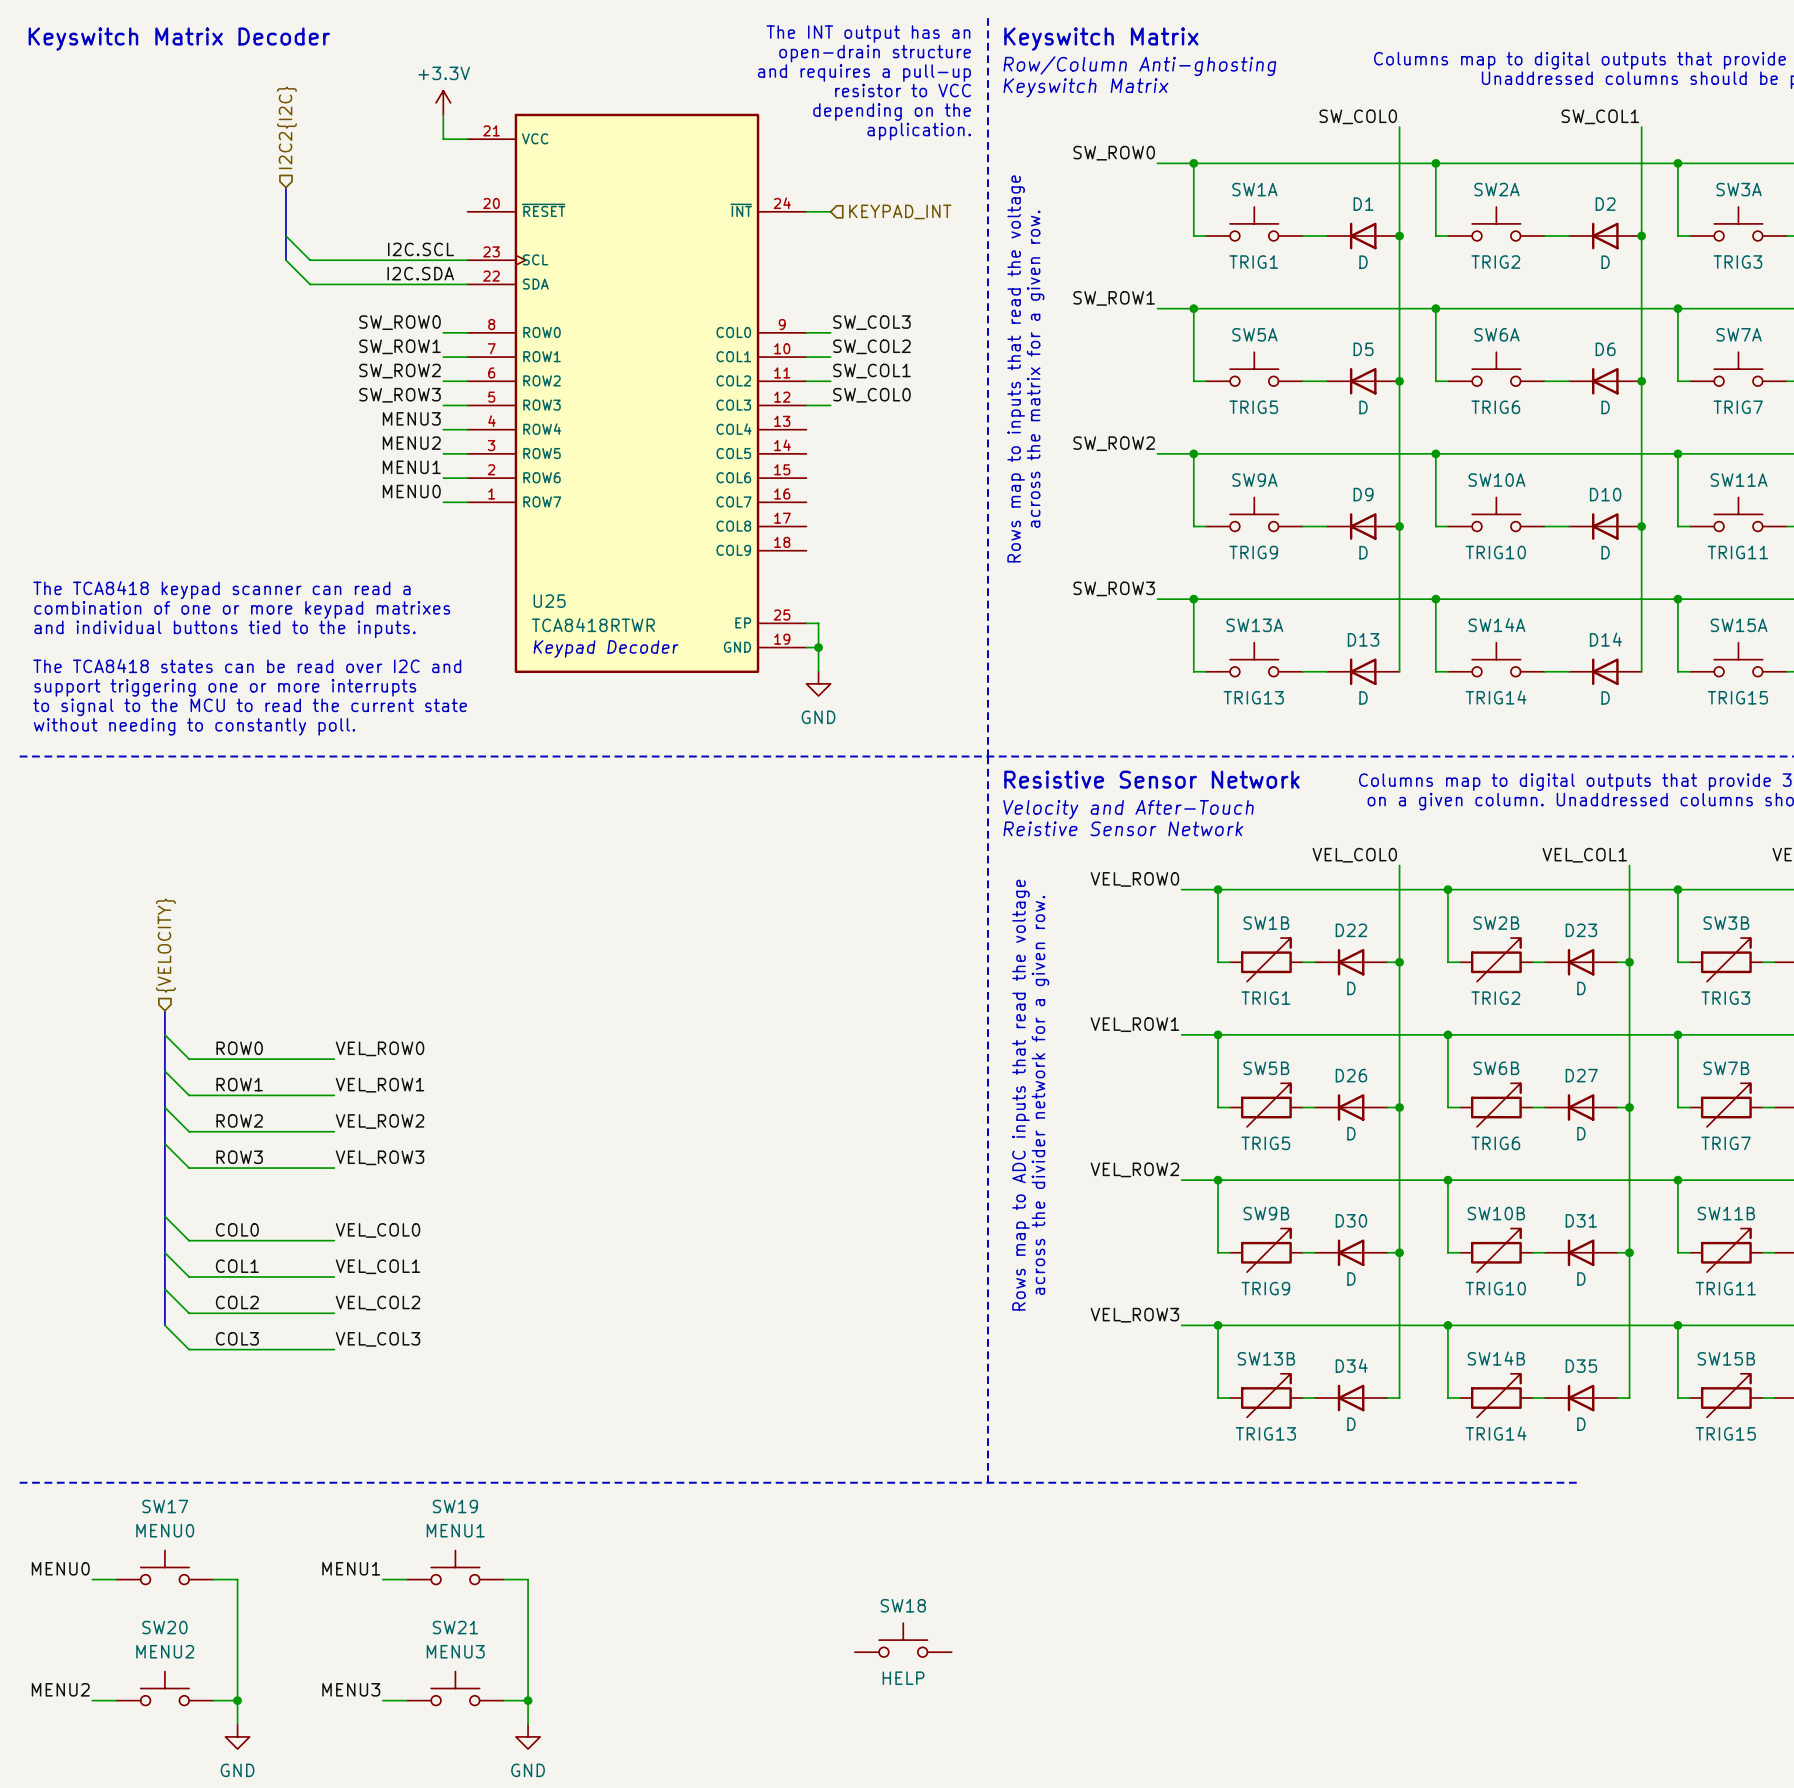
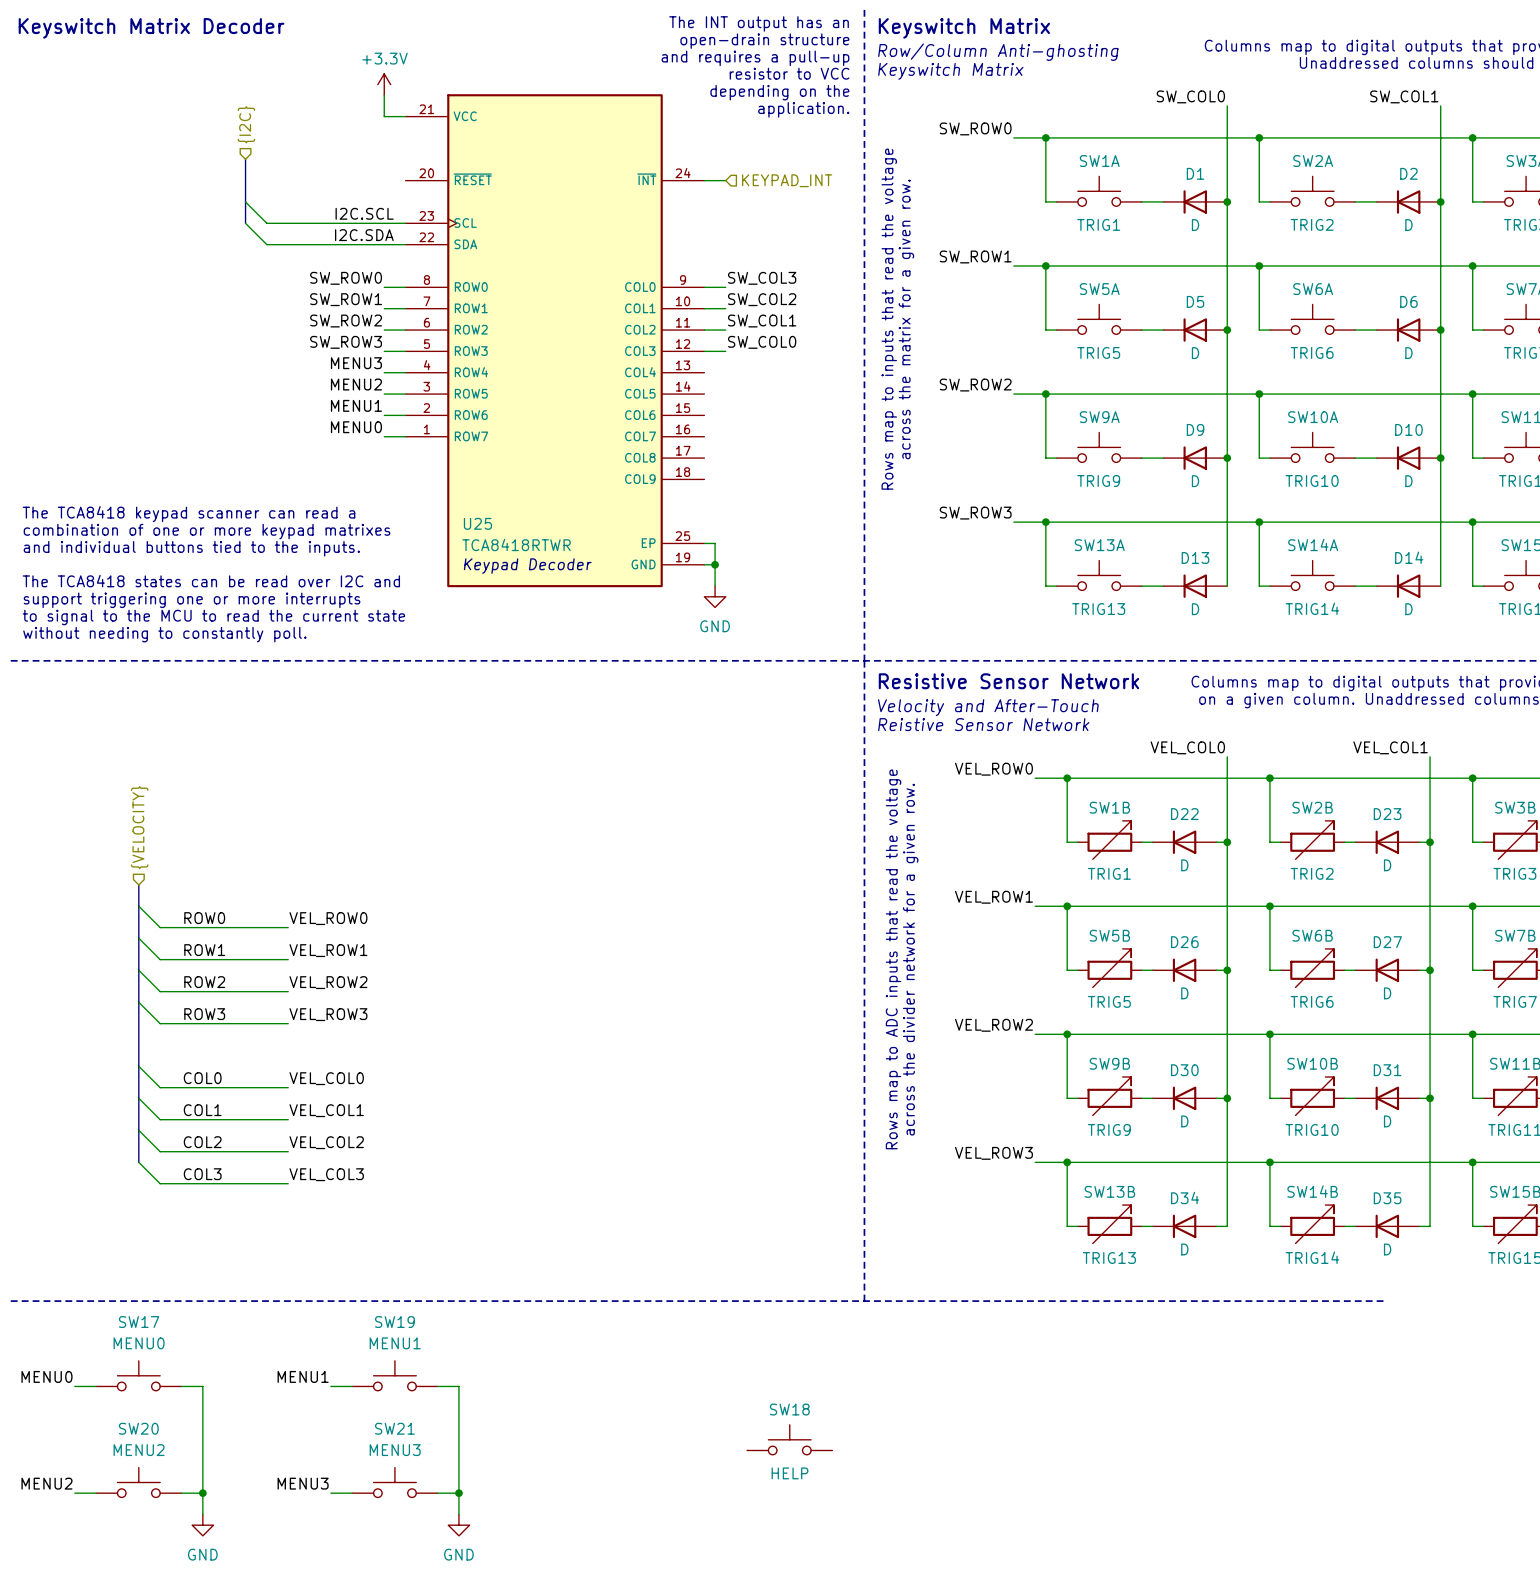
hierarchical label: I2C2{I2C} (286, 127) -> {I2C} (246, 124)

